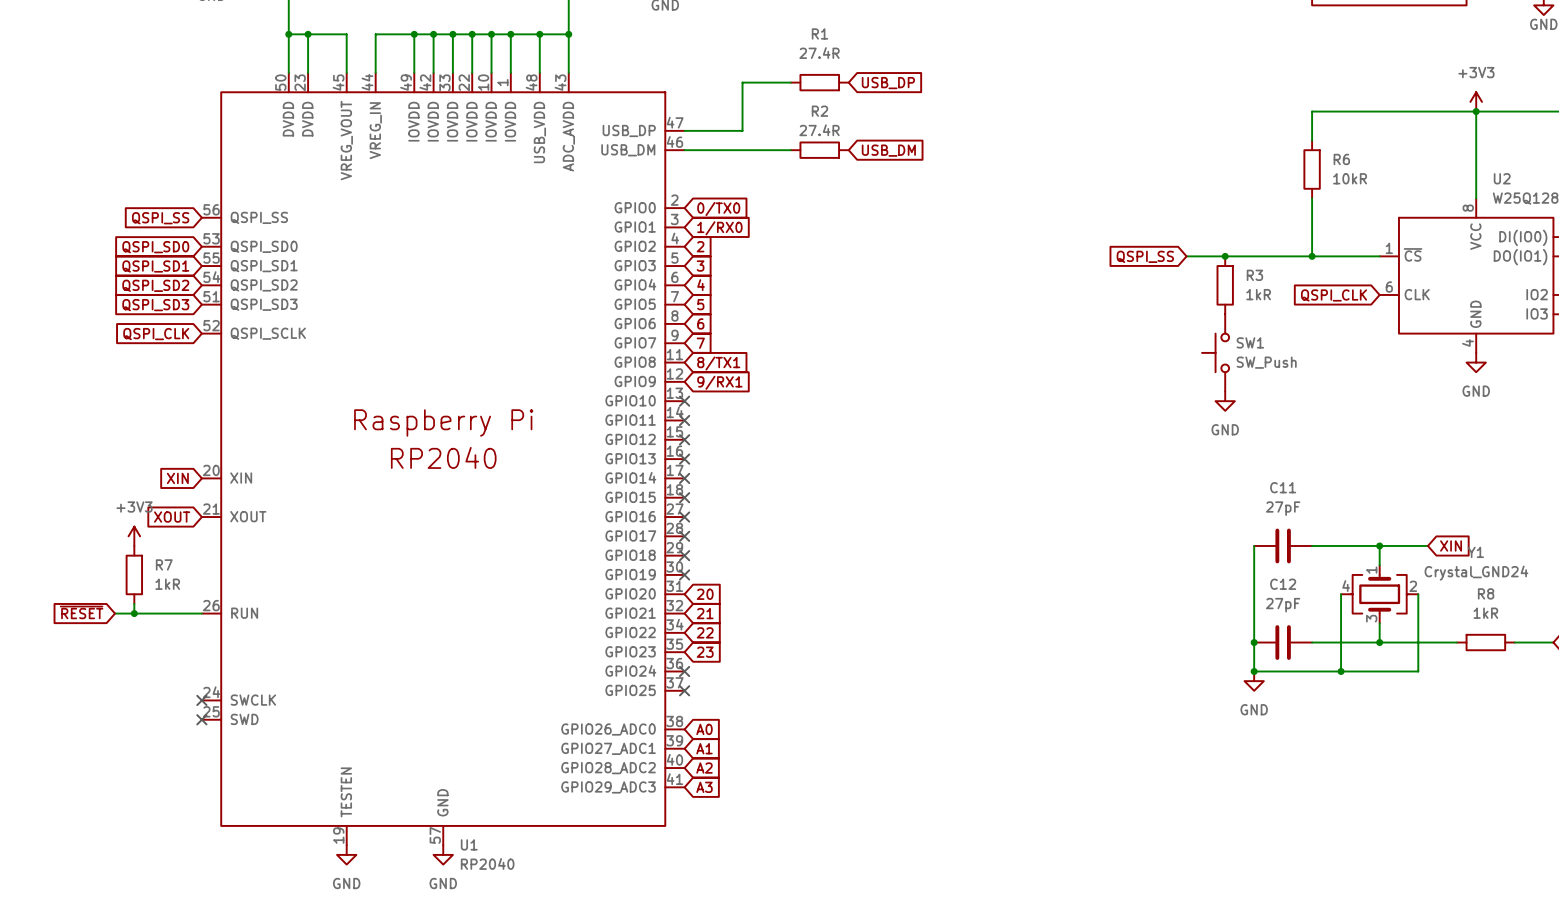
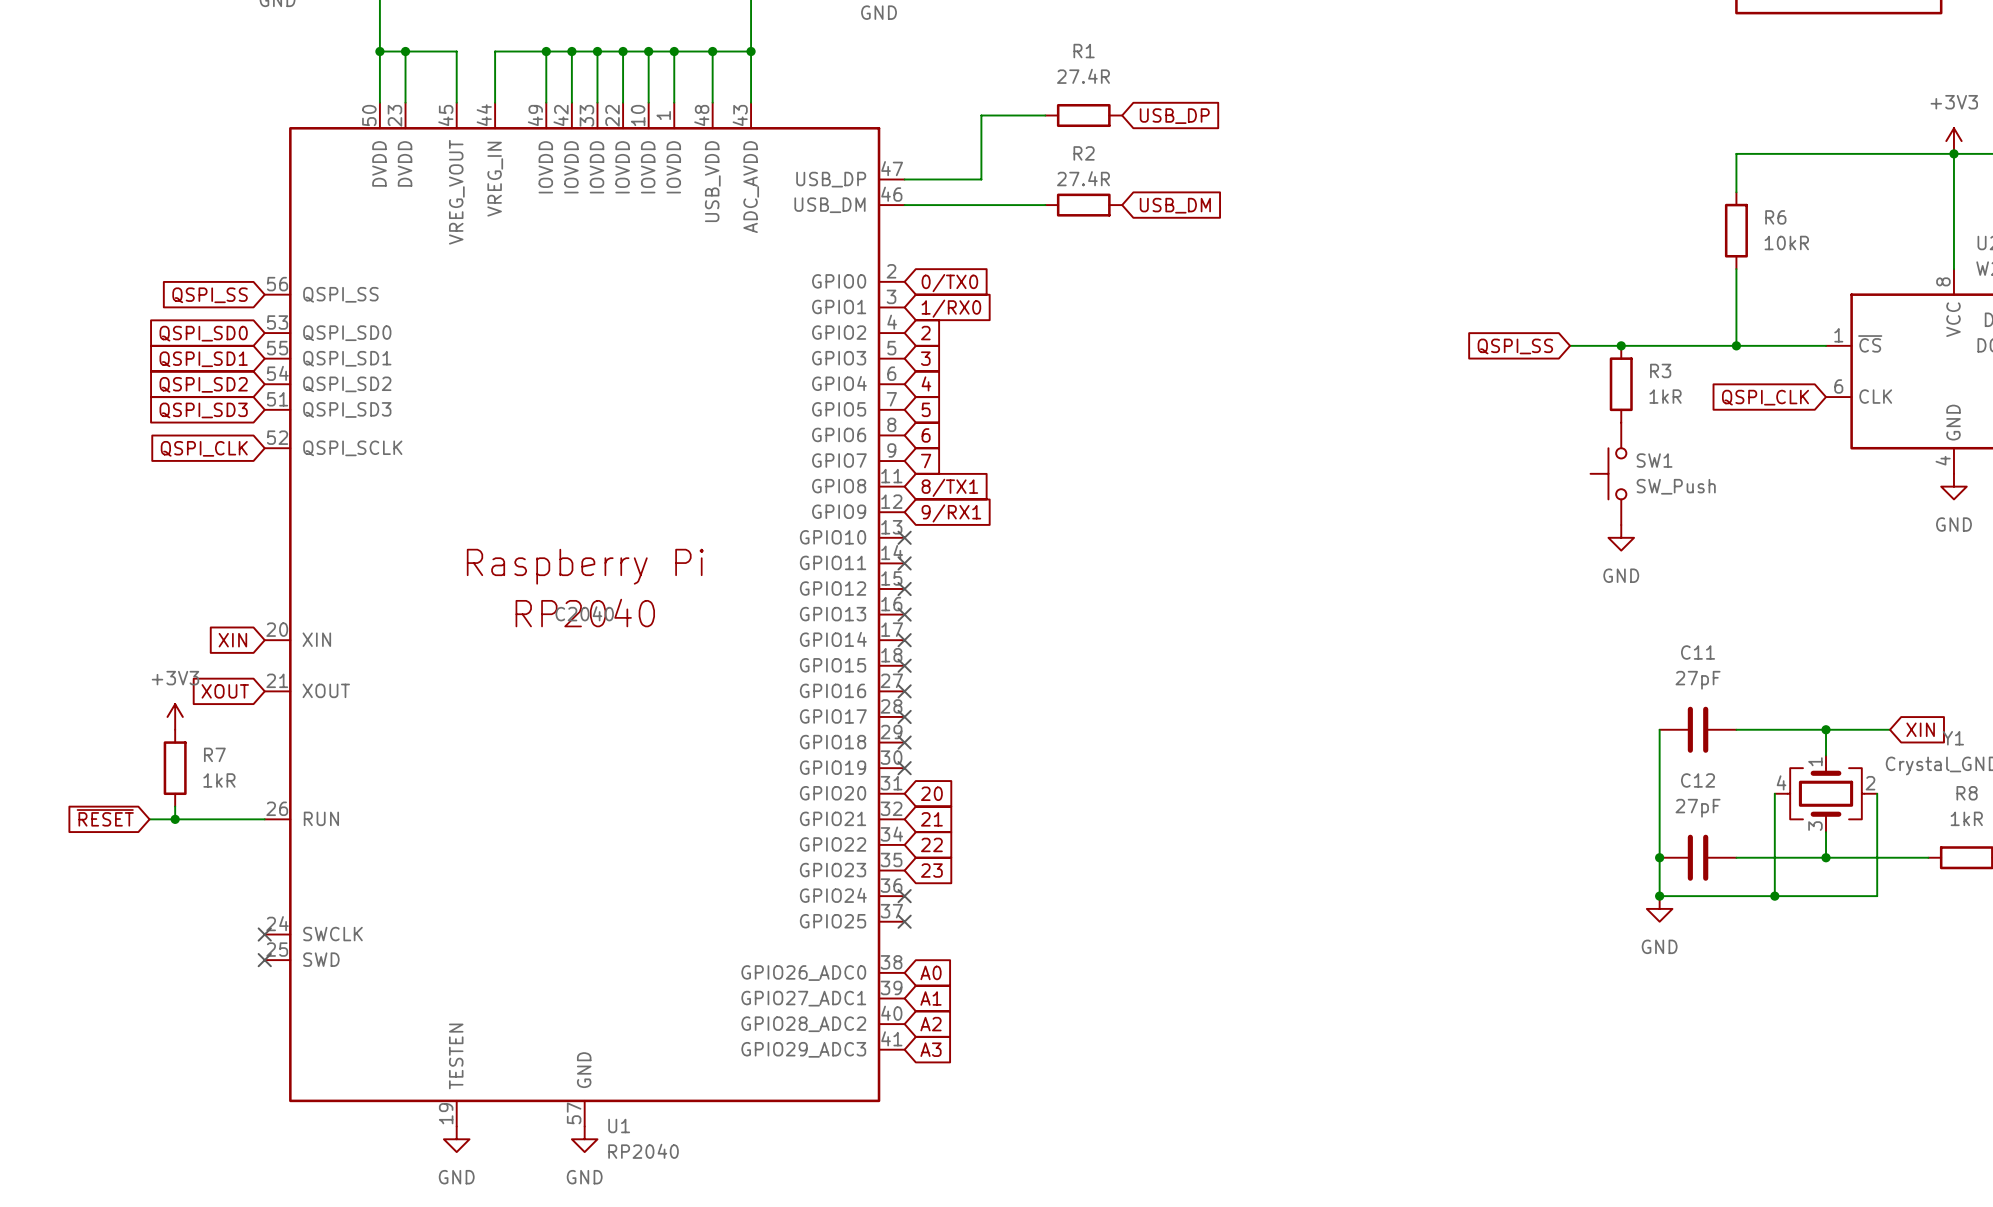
U1 text: none -> C2040 (584, 613)

